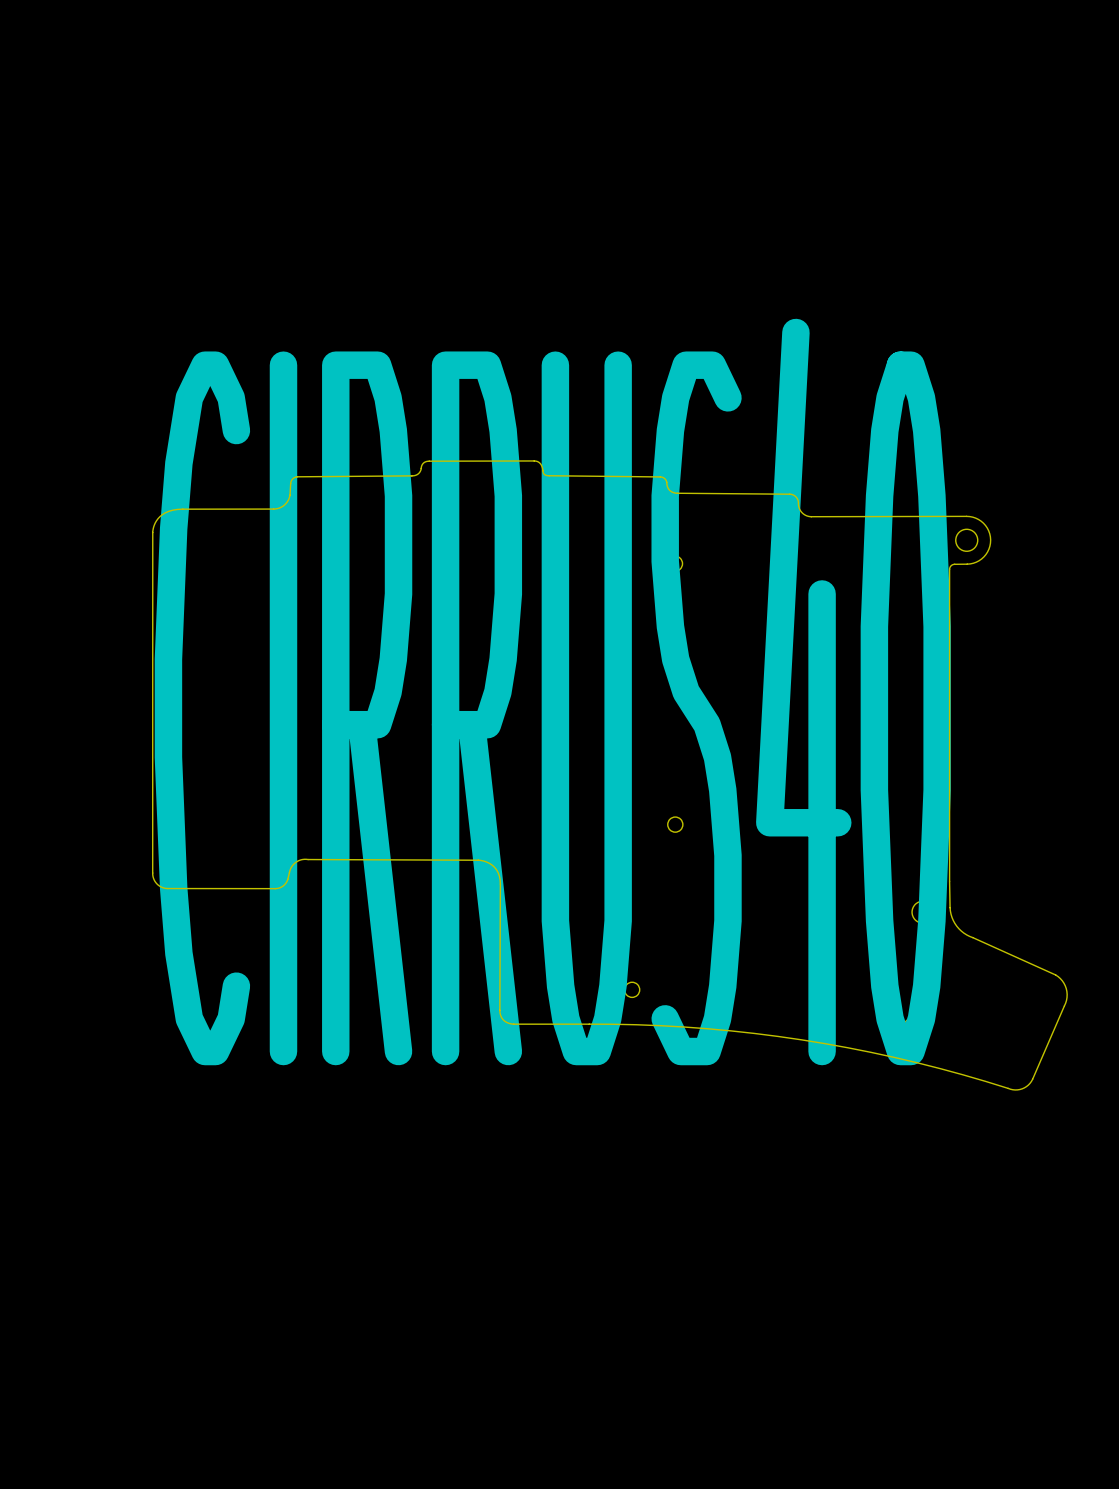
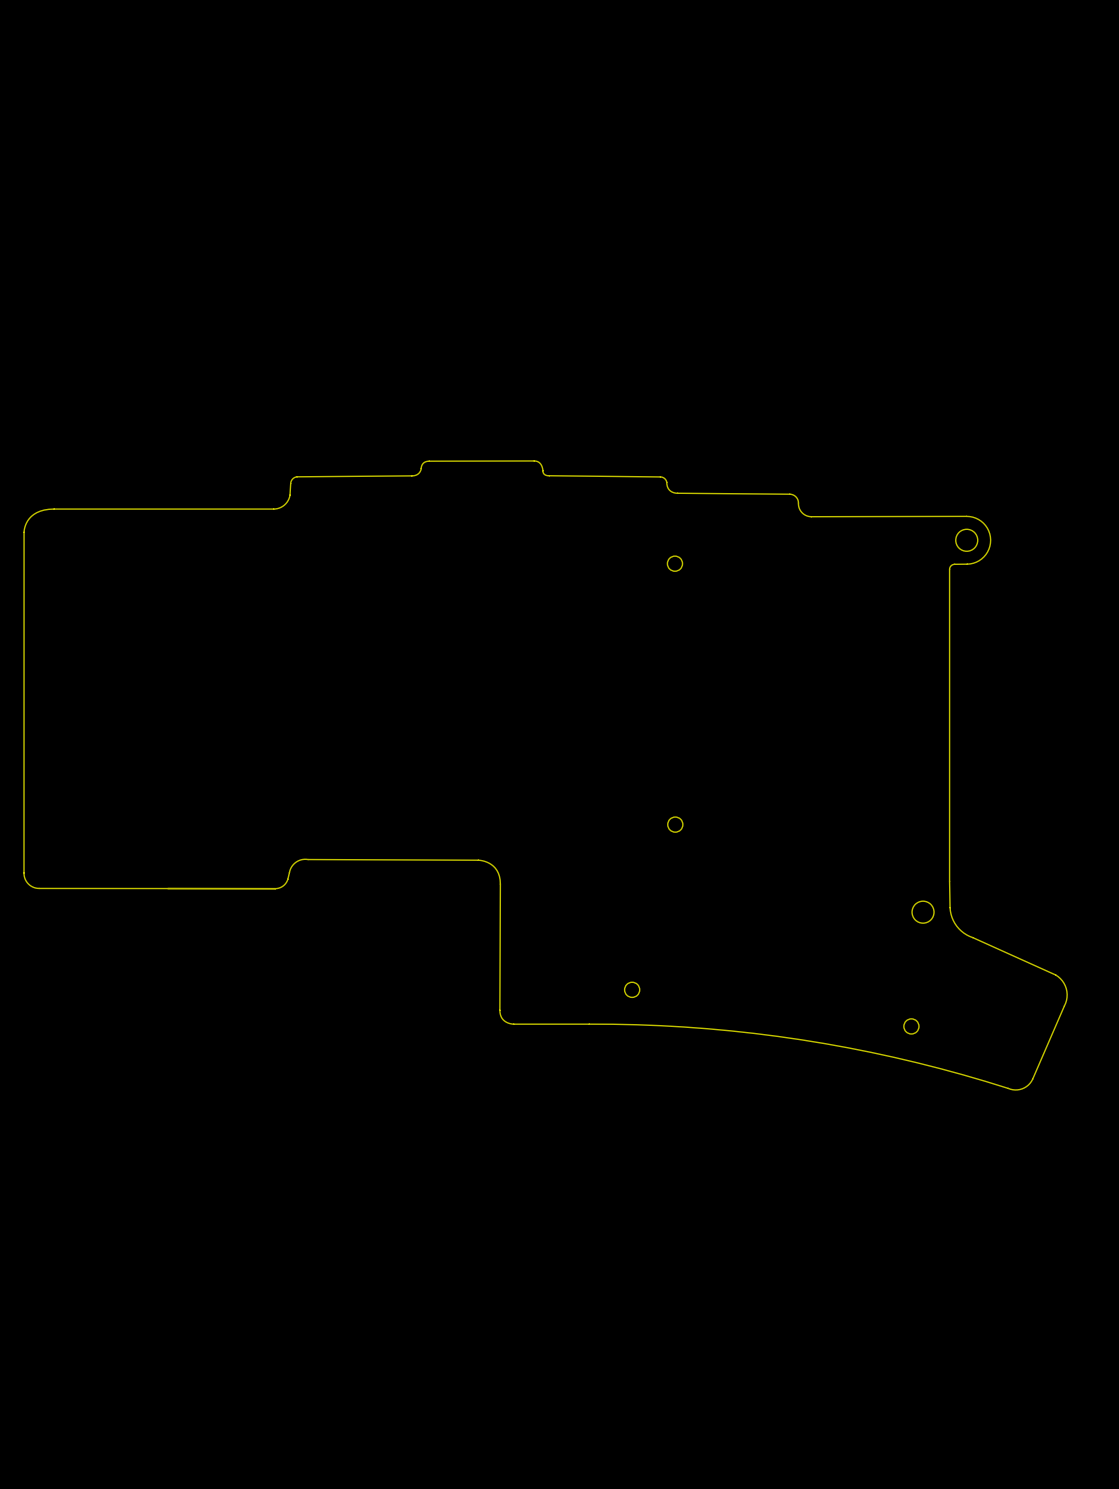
board edge: (273, 509) (177, 509) (162, 514) (153, 527) (152, 874) (158, 885) (167, 888) -> (273, 509) (54, 509) (36, 512) (27, 520) (24, 532) (23, 872) (28, 883) (37, 888) (275, 888)
text: CIRRUS40 (552, 692) -> none

